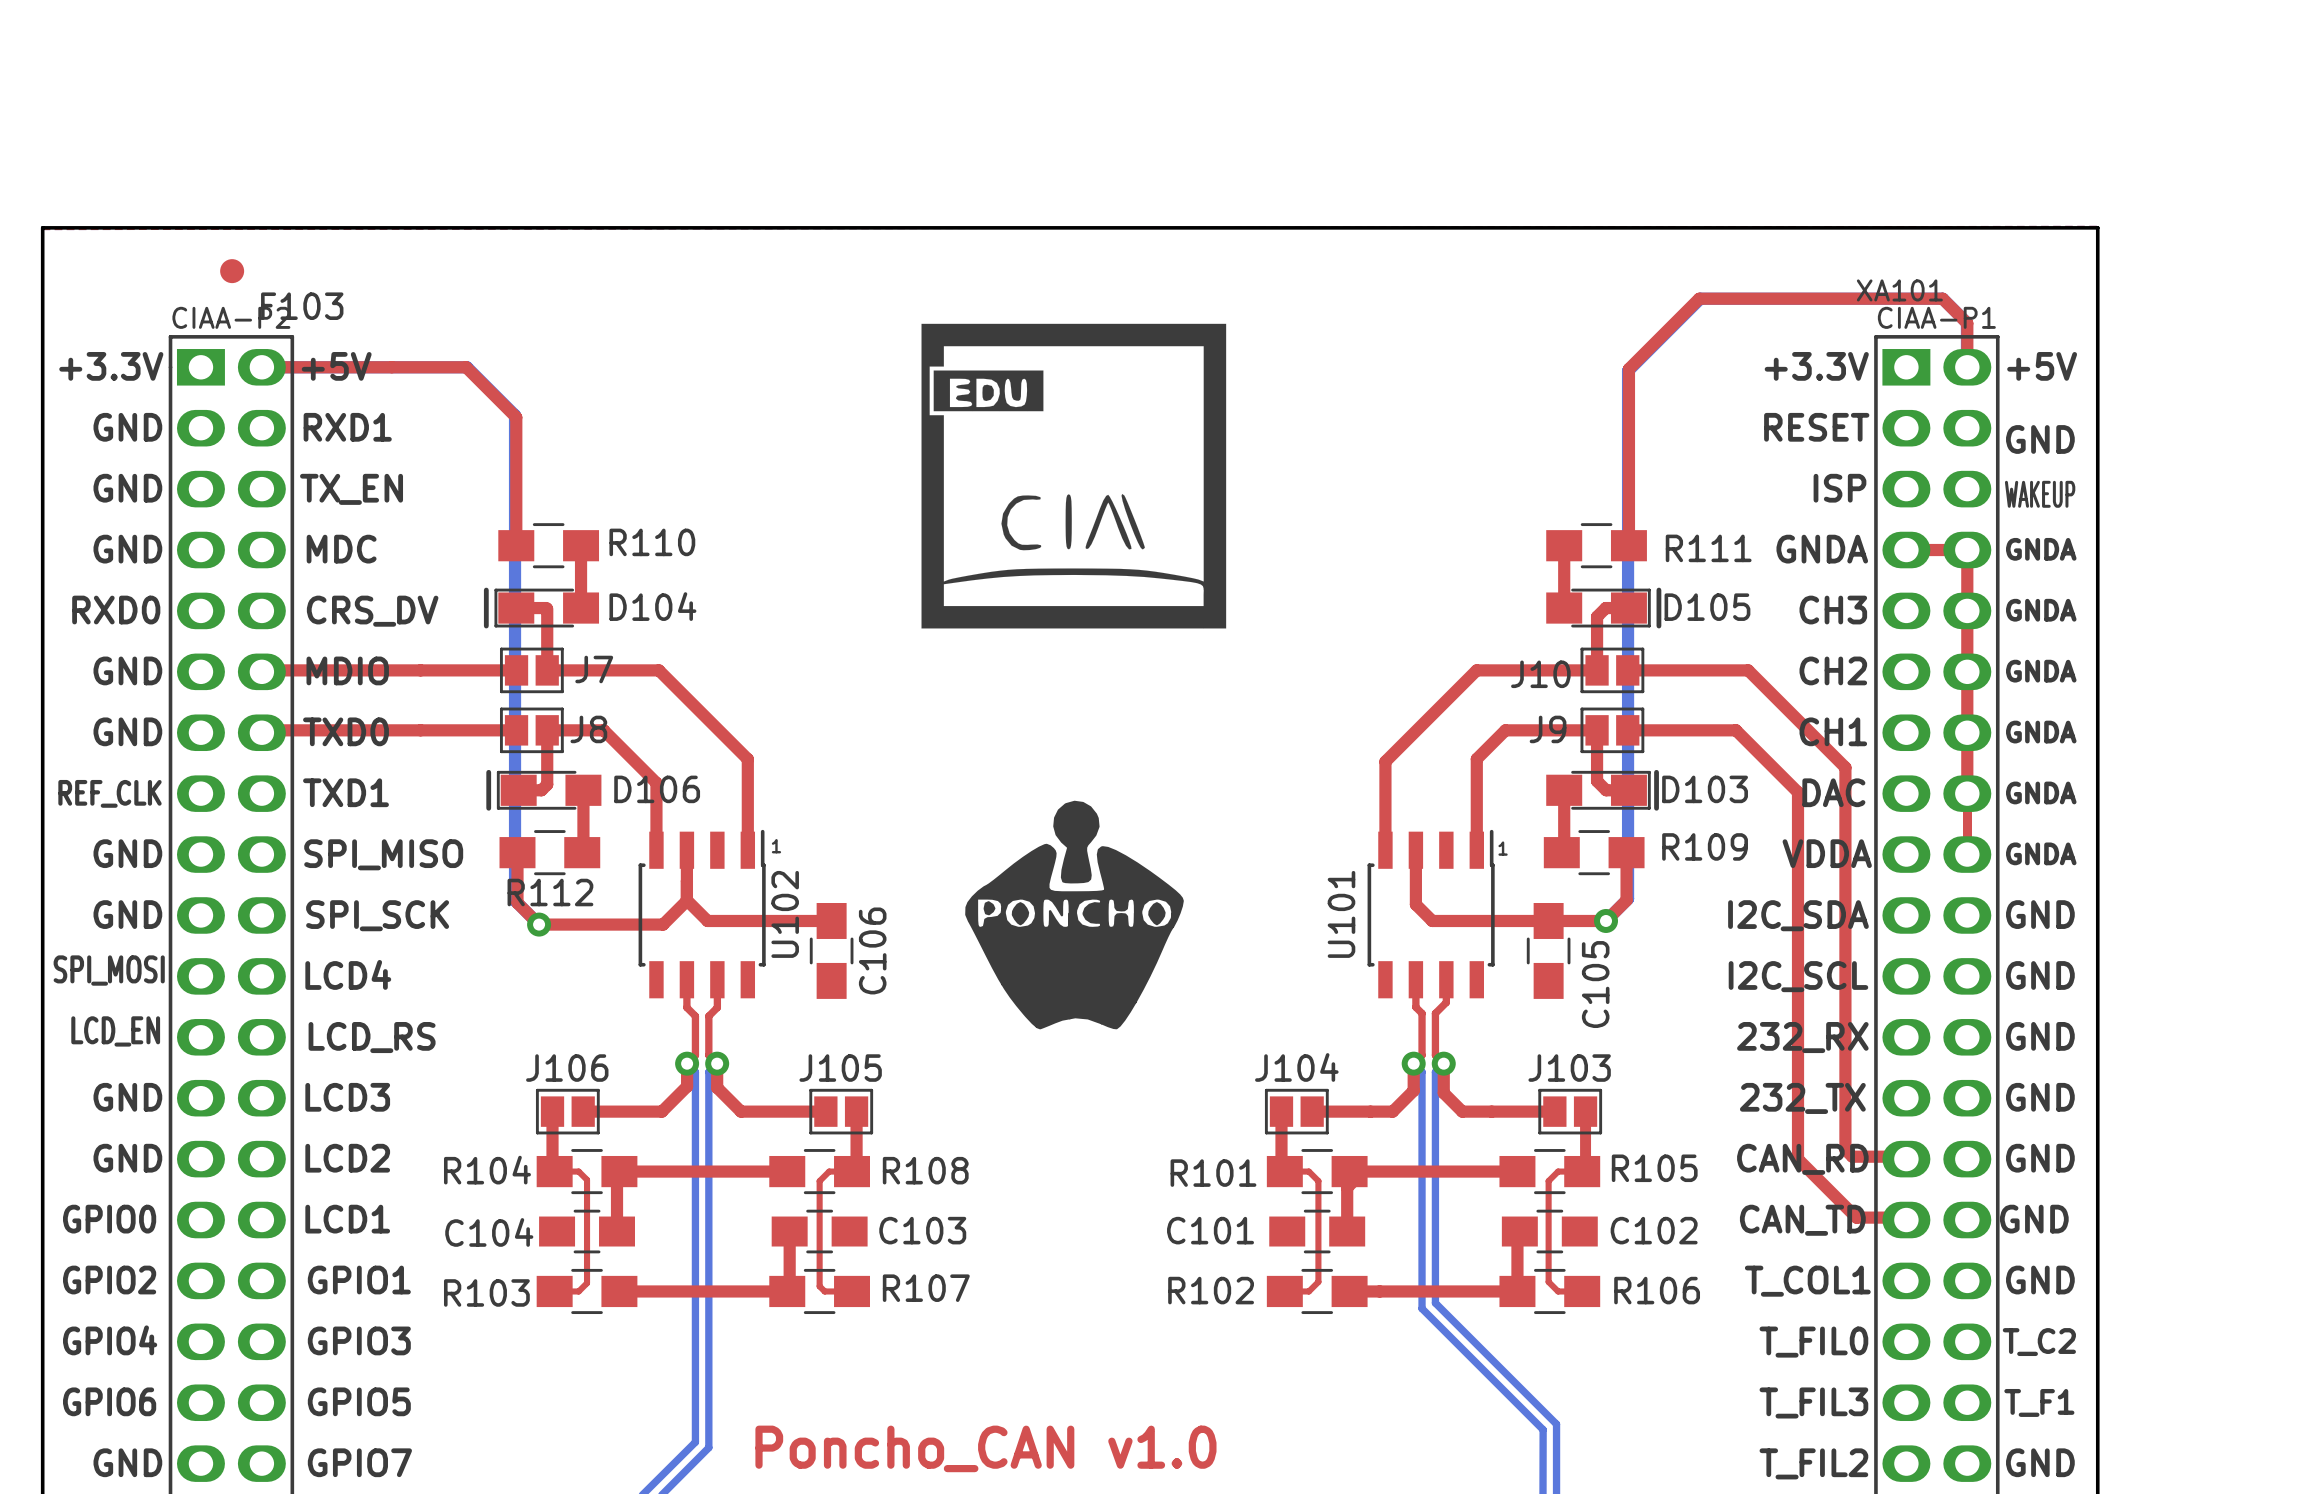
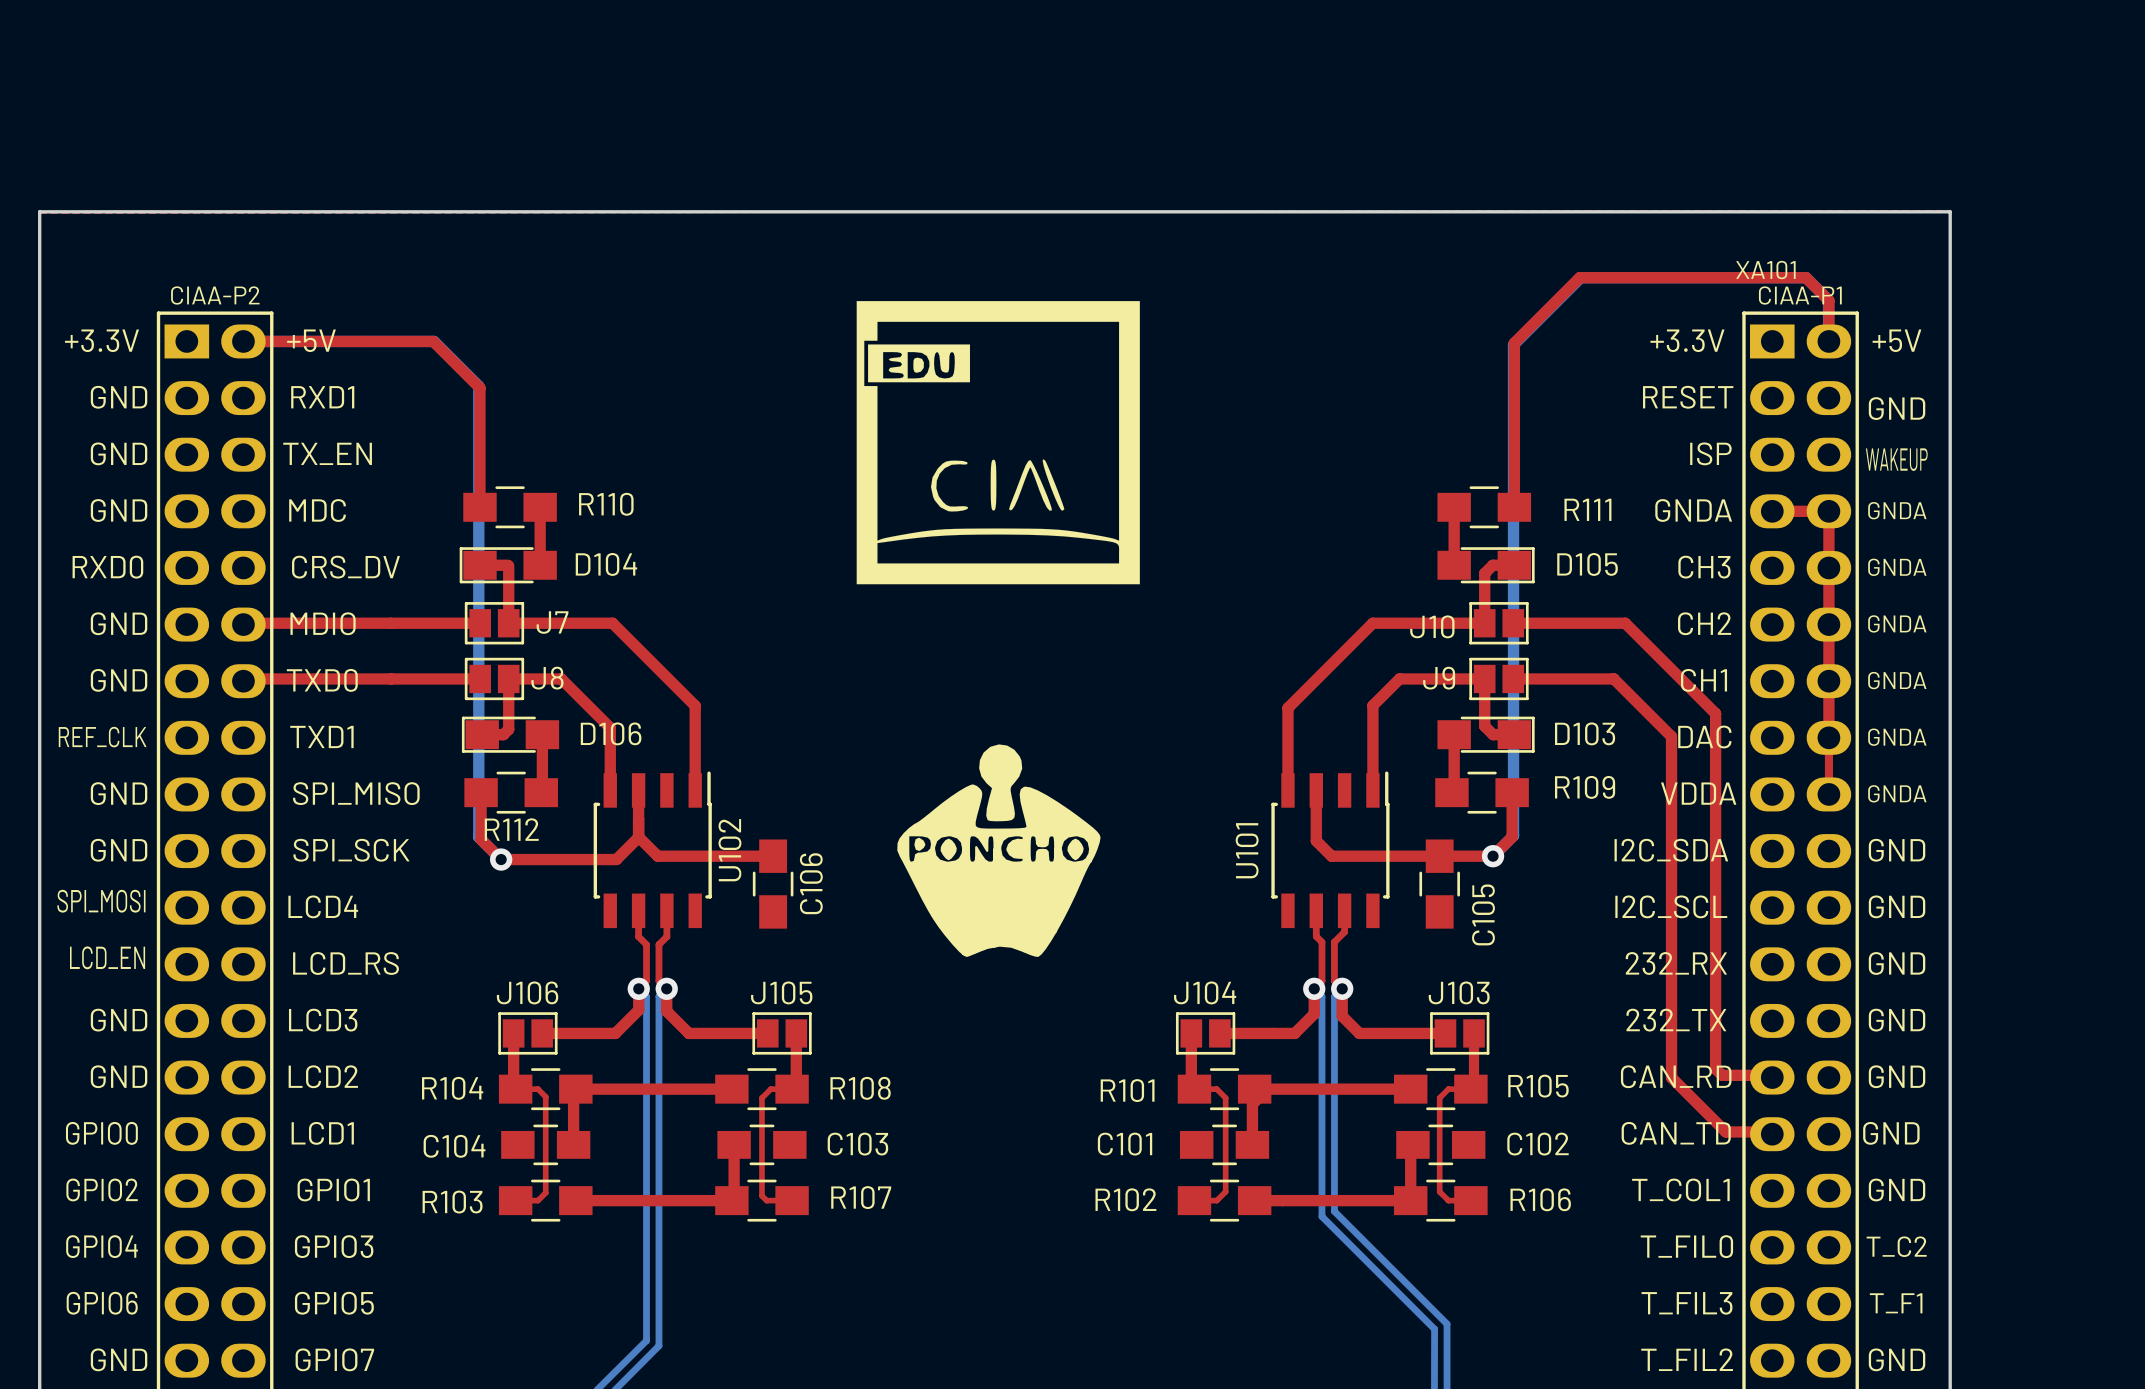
F103: (232, 271) -> none
line: (486, 590) (486, 626) -> none
line: (1658, 590) (1658, 626) -> none
line: (488, 772) (488, 808) -> none
line: (1656, 772) (1656, 808) -> none
text: 1 (776, 846) -> none
text: 1 (1503, 848) -> none
text: Poncho_CAN v1.0 (985, 1448) -> none

